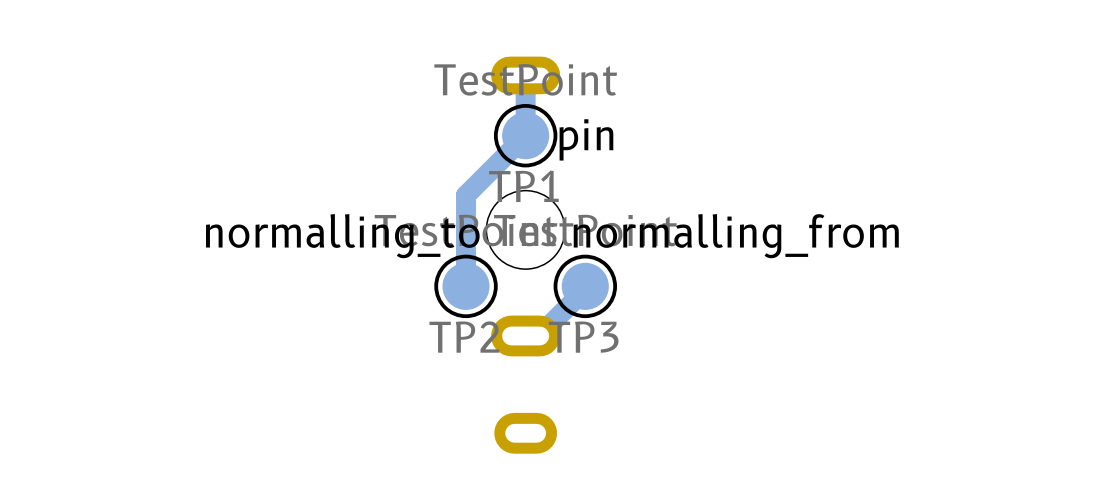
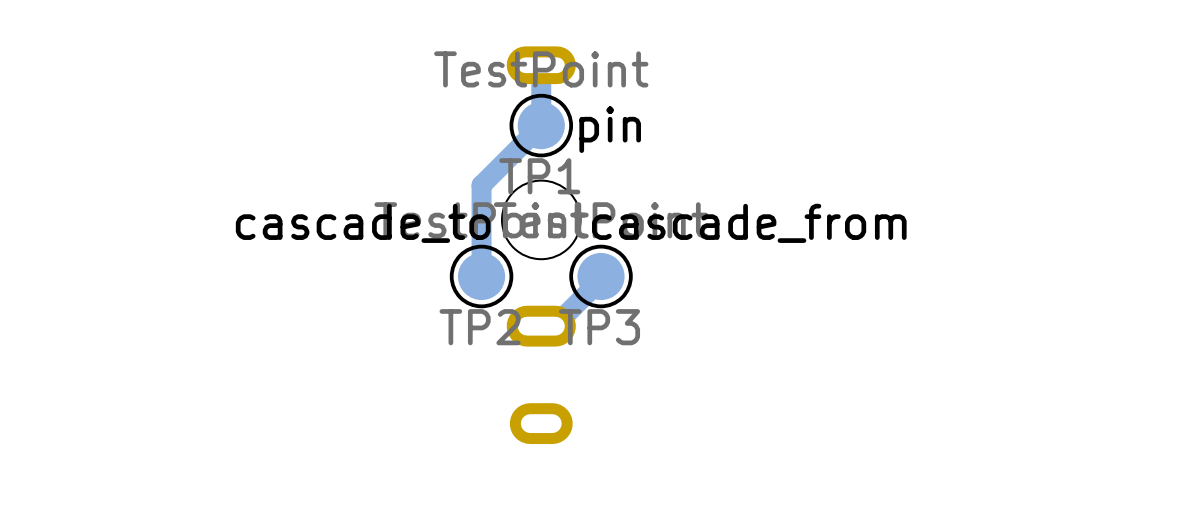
text: normalling_to (342, 236) -> cascade_to (363, 223)
text: normalling_from (736, 236) -> cascade_from (749, 223)

